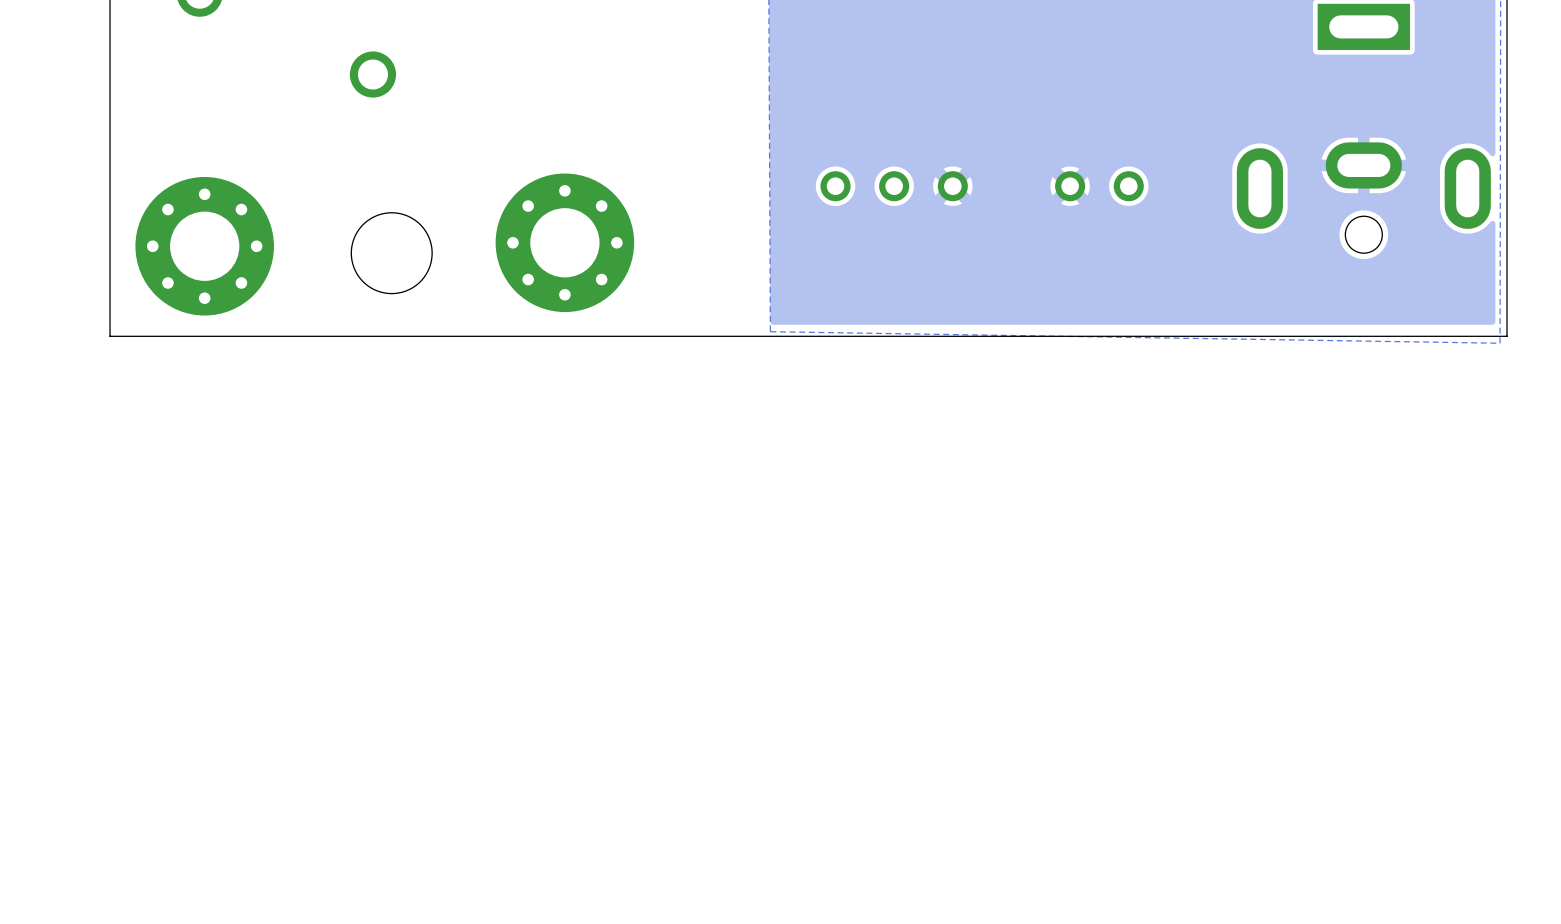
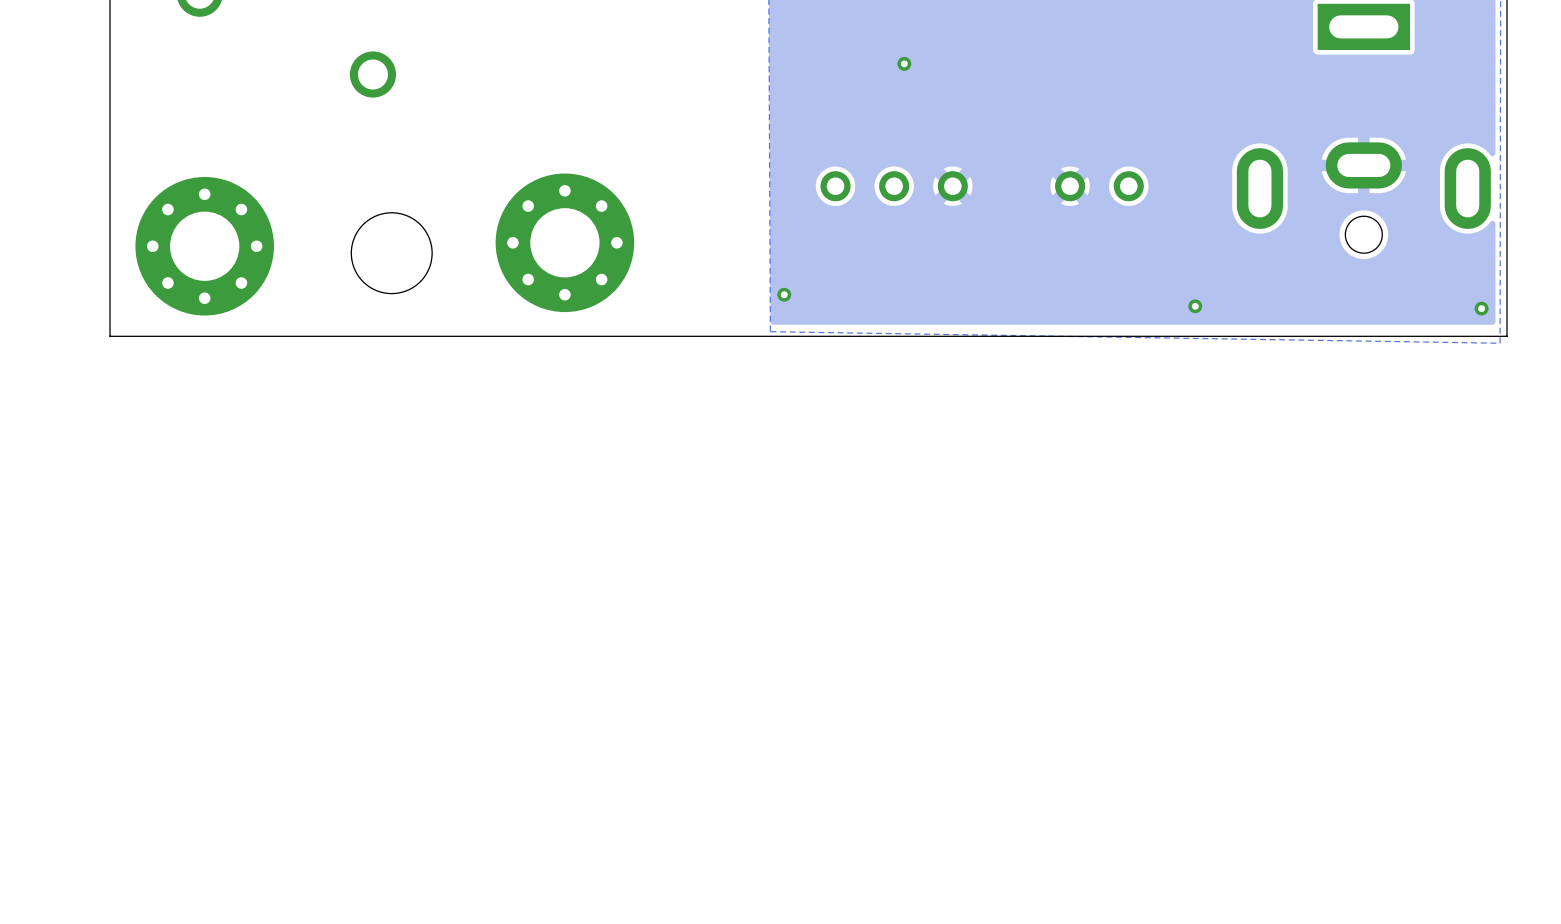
via: none -> (904, 63)
via: none -> (784, 294)
via: none -> (1195, 306)
via: none -> (1481, 308)

